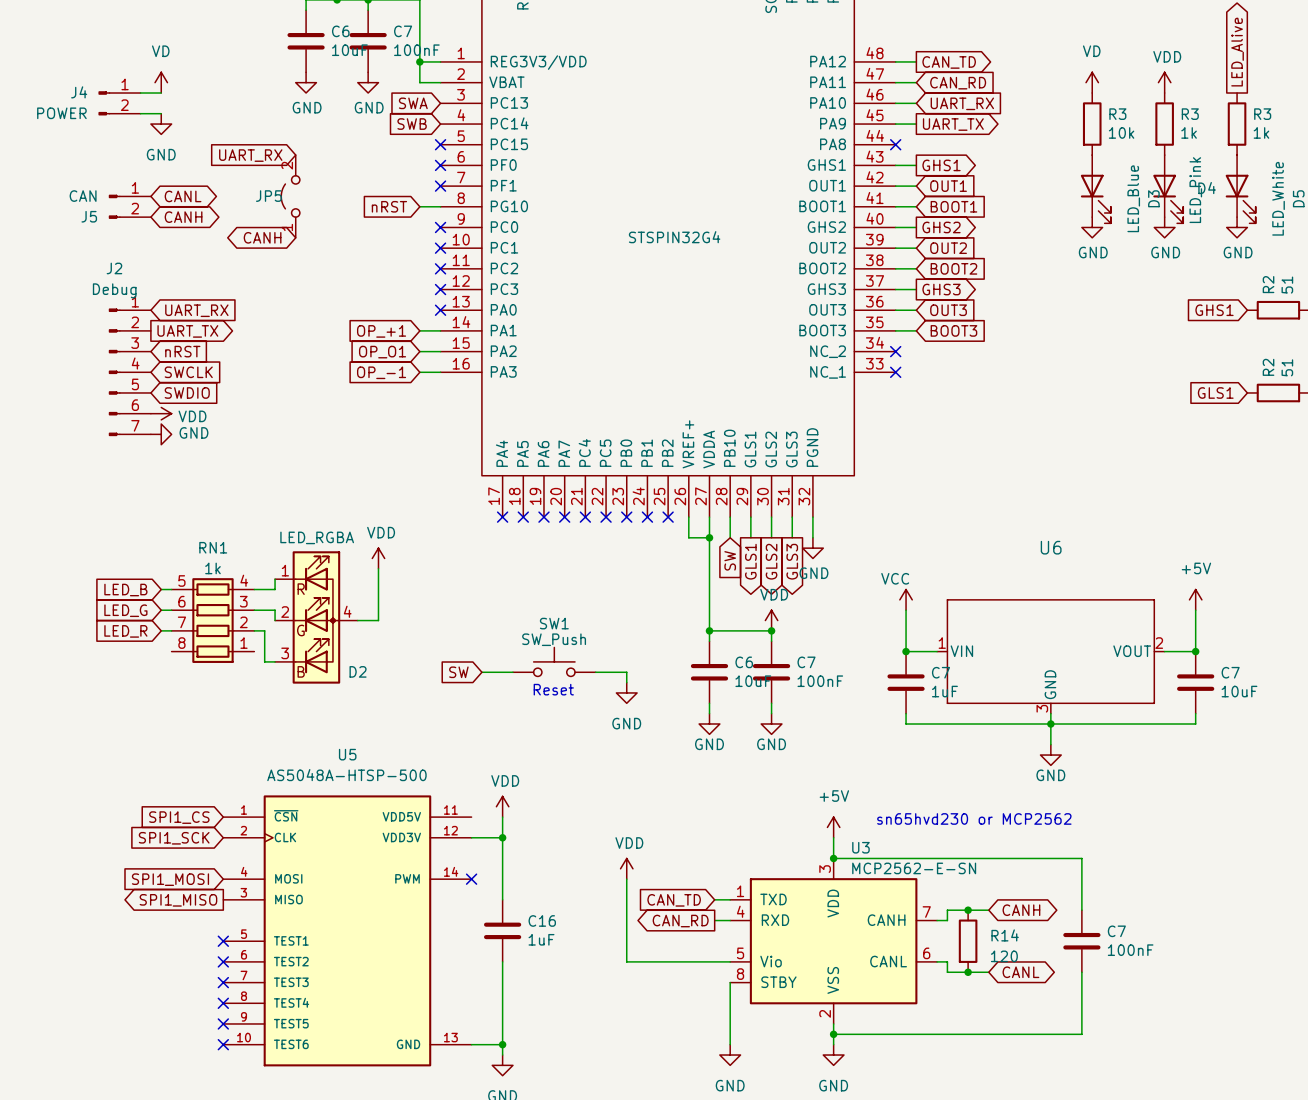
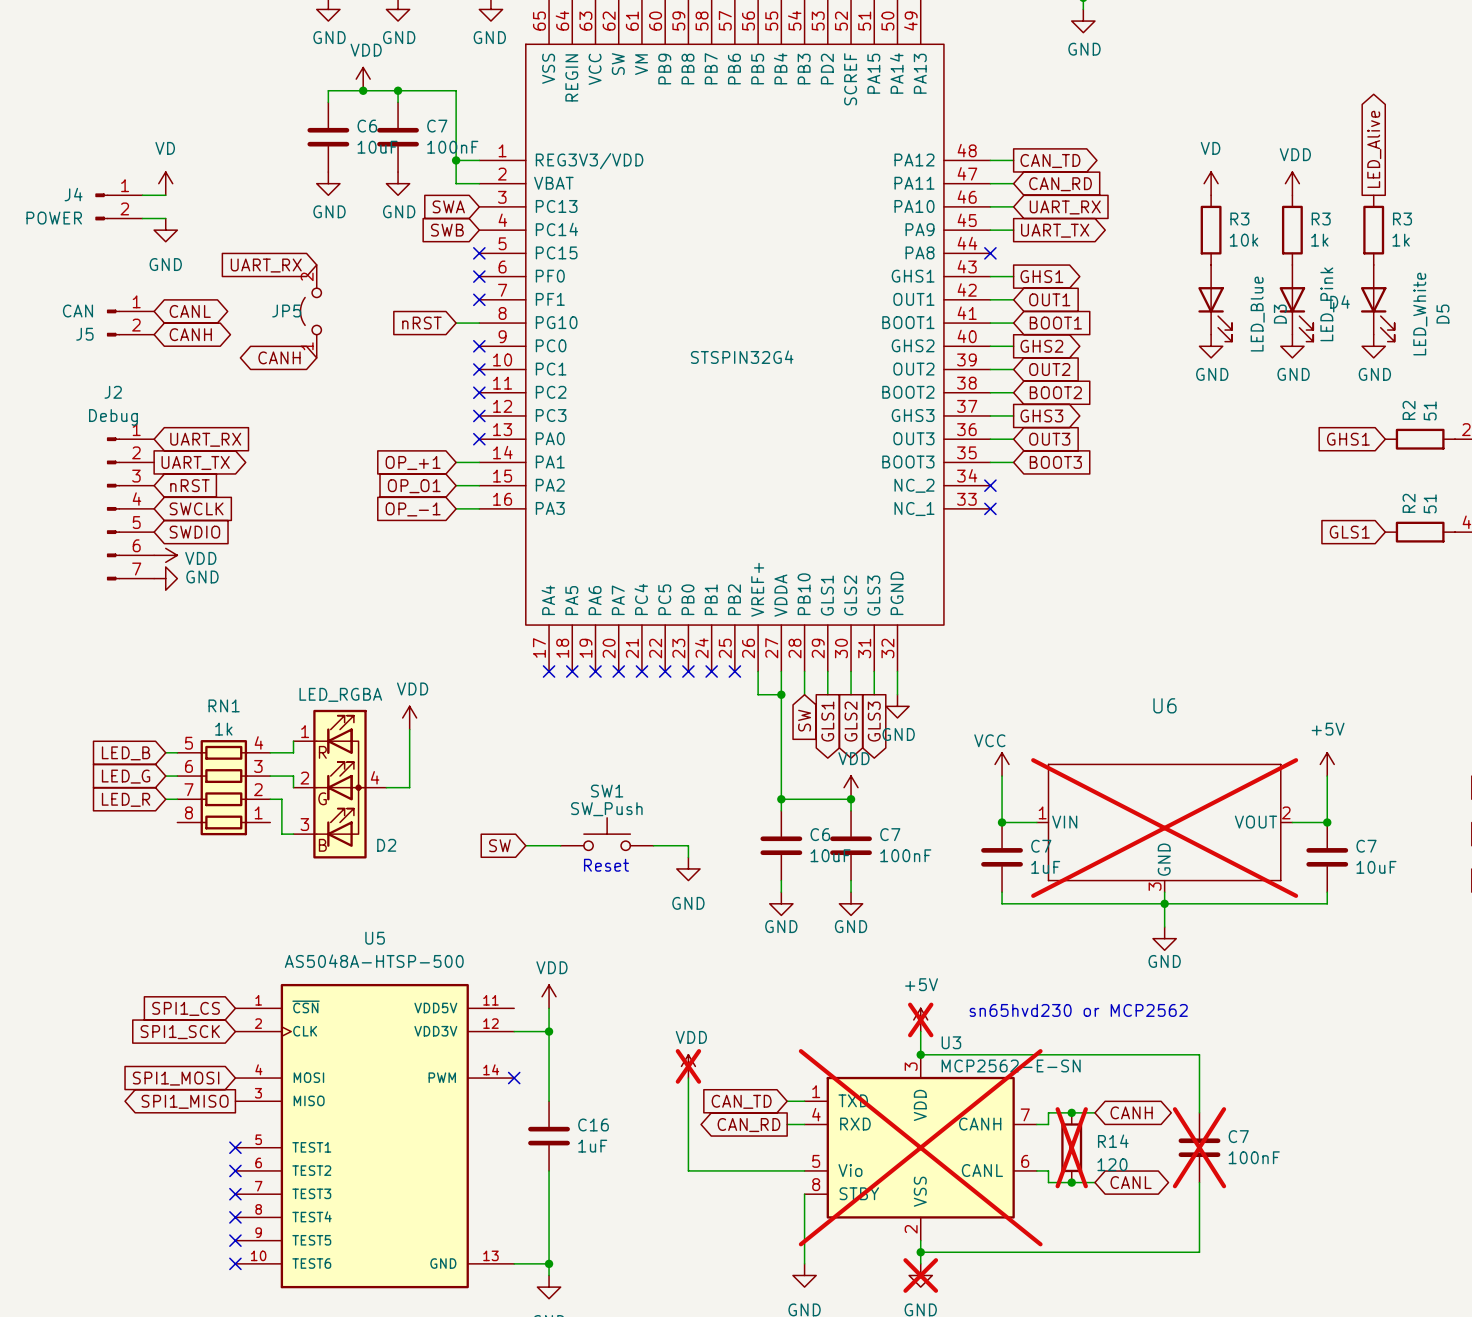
U6 do-not-place cross: none -> (1164, 828)
power symbol do-not-place cross: none -> (920, 1019)
power symbol do-not-place cross: none -> (688, 1066)
U3 do-not-place cross: none -> (920, 1147)
R14 do-not-place cross: none -> (1071, 1147)
C7 do-not-place cross: none -> (1199, 1147)
power symbol do-not-place cross: none -> (920, 1275)

